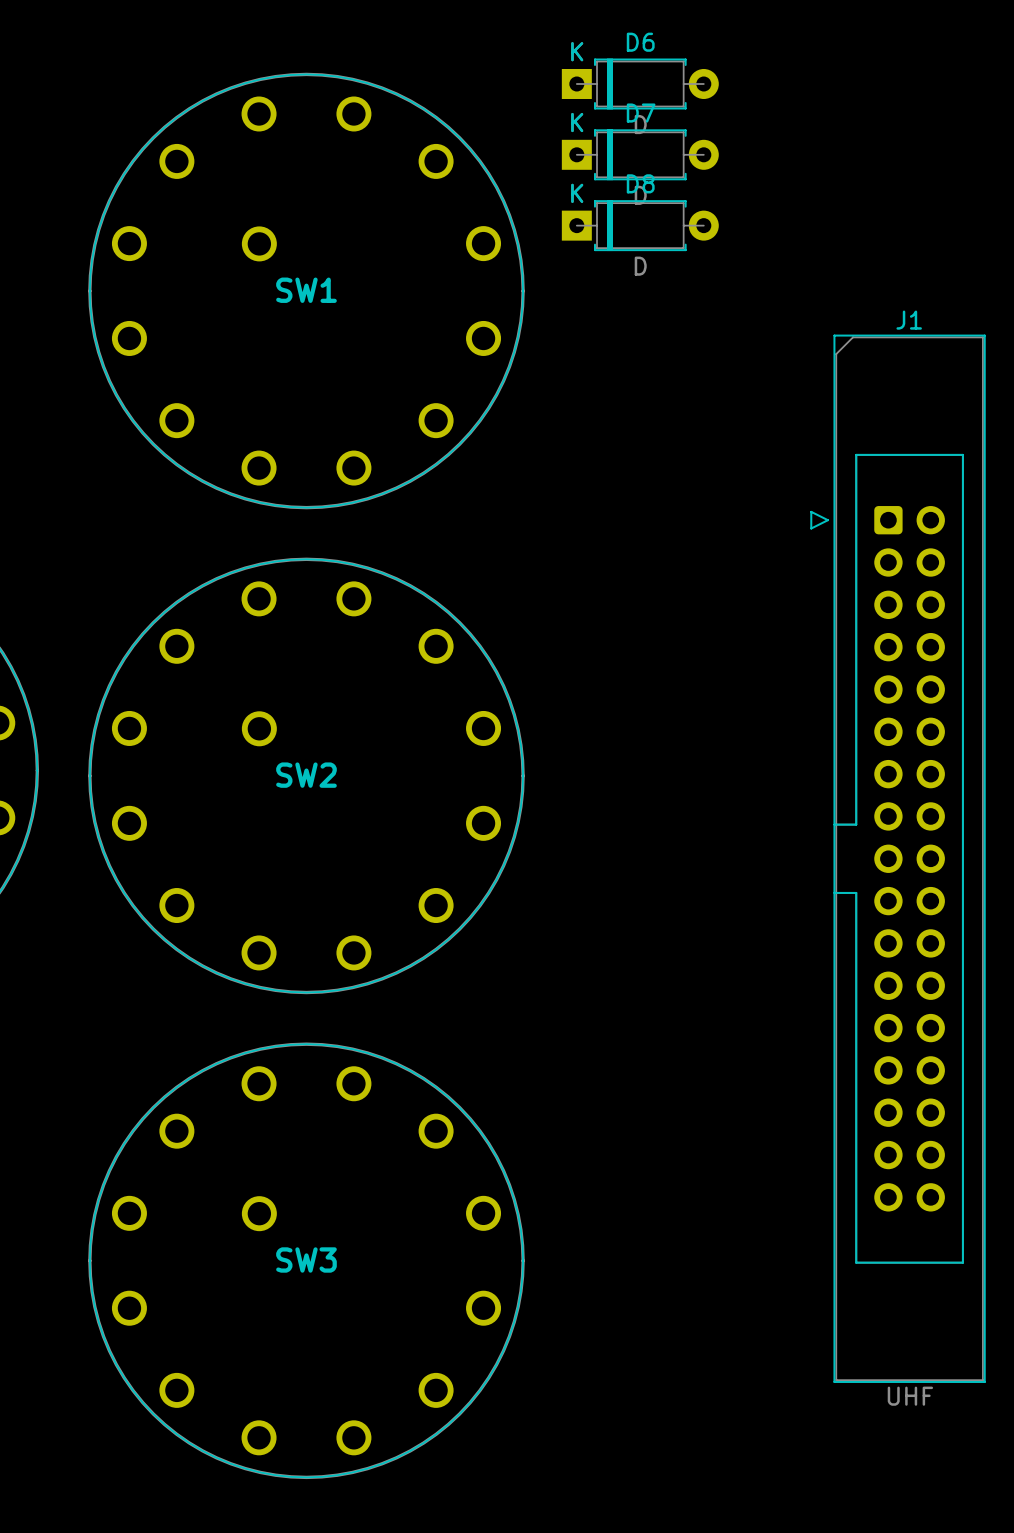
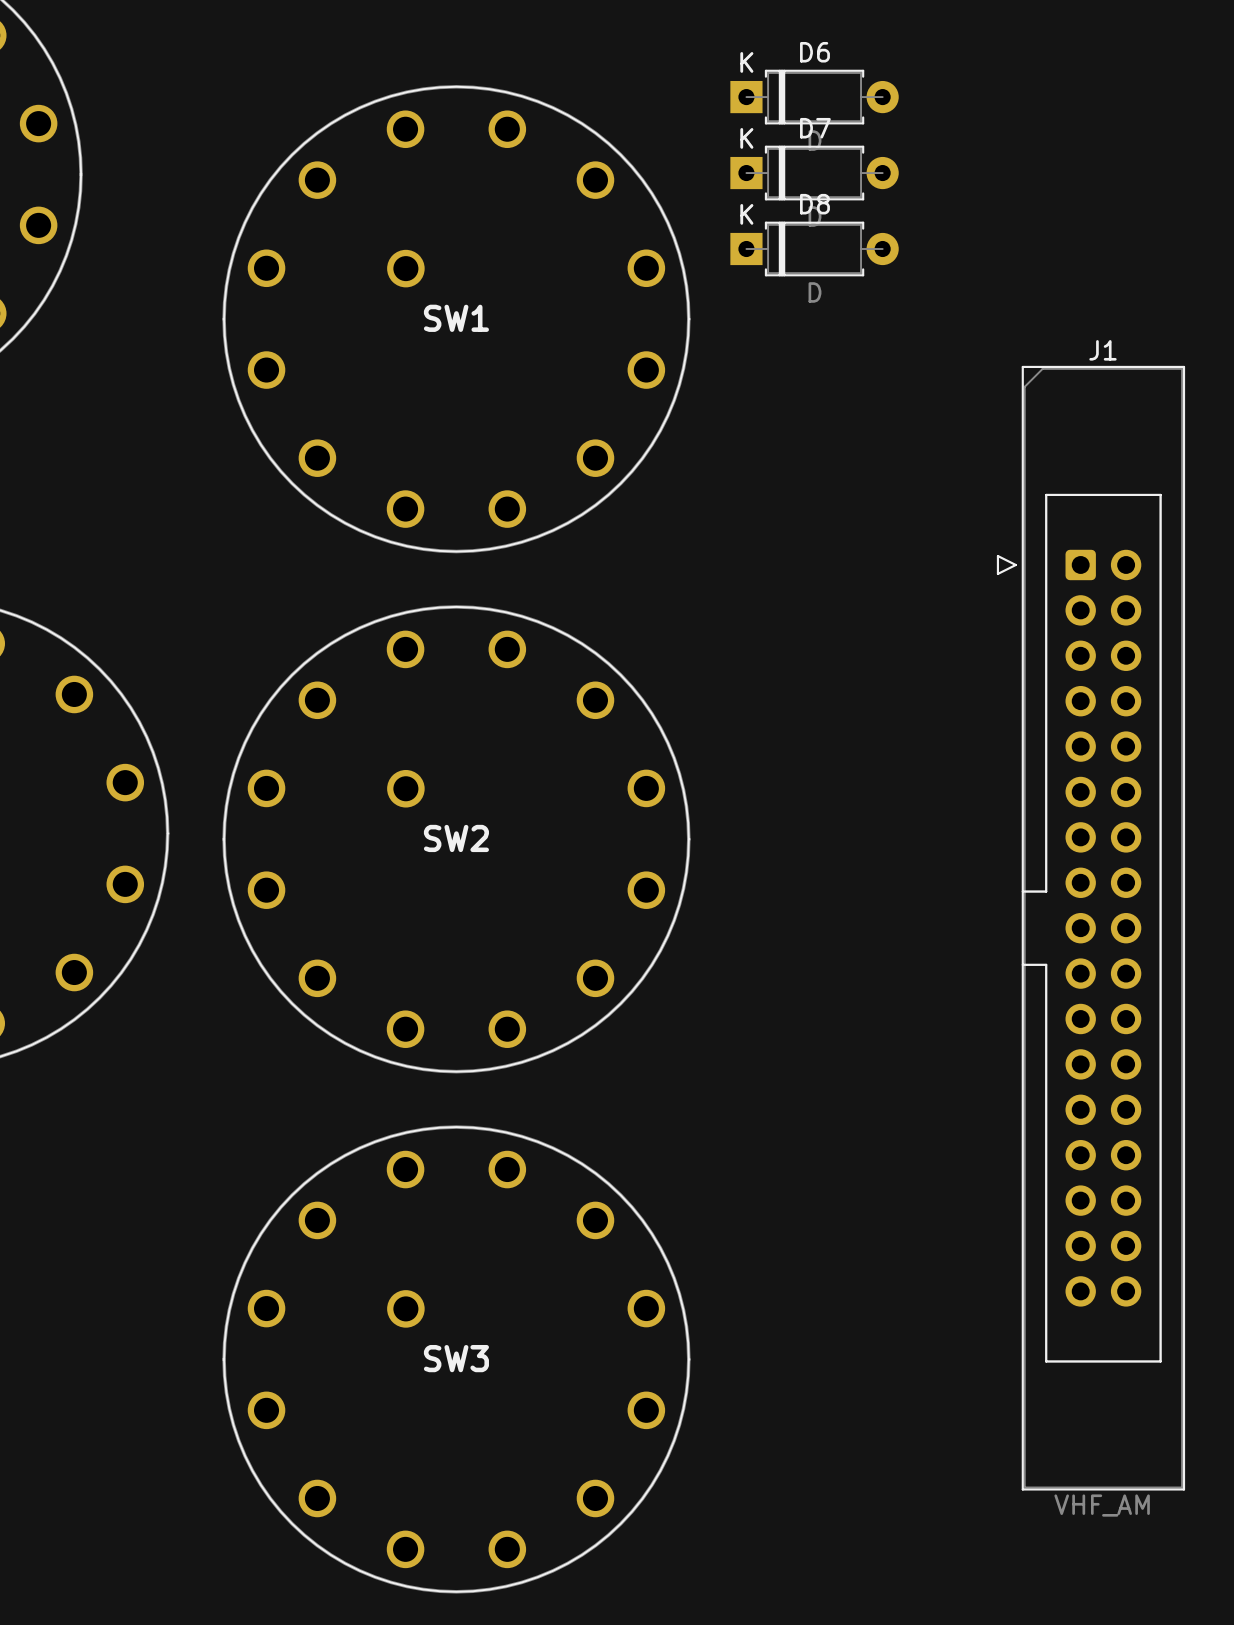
J1 value: UHF (910, 1396) -> VHF_AM (1102, 1505)

